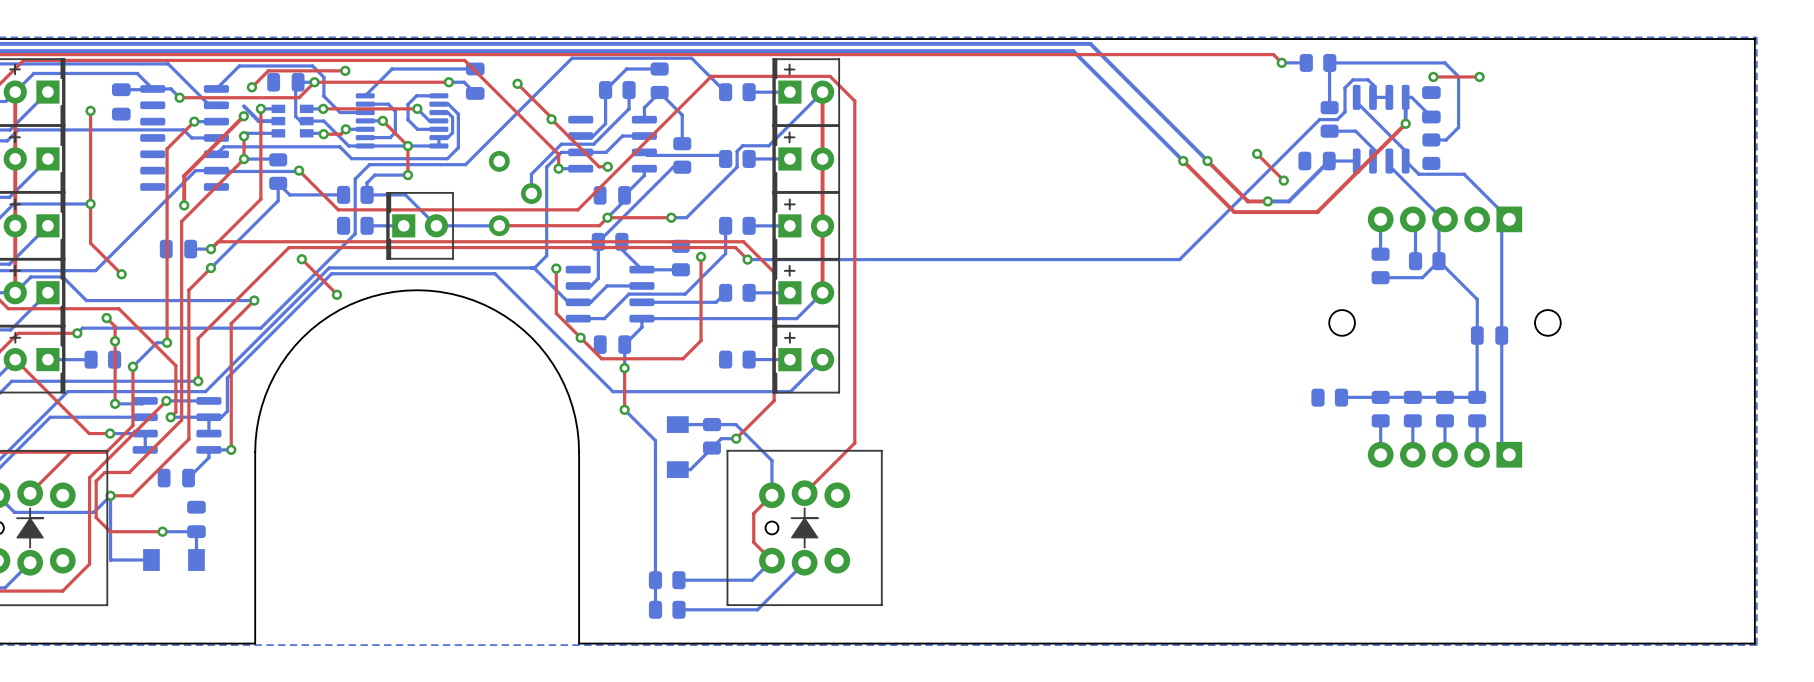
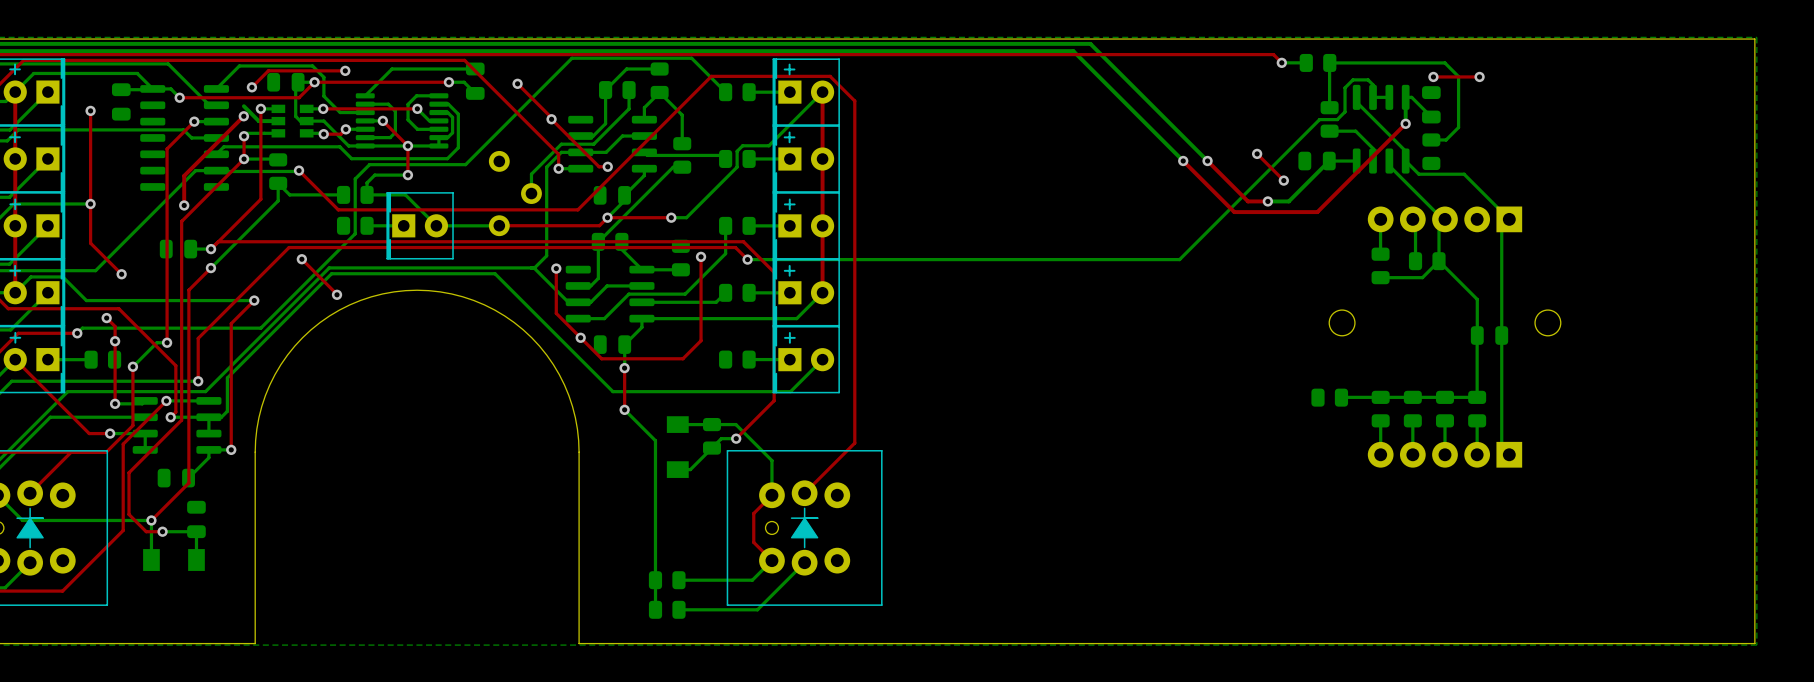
top track: (188, 439) (132, 495) (110, 495) -> (188, 439) (188, 483) (151, 520)
top track: (123, 444) (89, 477) (89, 564) -> (123, 444) (123, 530) (89, 564)
top track: (129, 472) (104, 472) (96, 481) (96, 517) (110, 531) (146, 531) -> (129, 472) (129, 514) (146, 531)
via position: (110, 495) -> (151, 520)
bottom track: (14, 512) (93, 512) (110, 495) (110, 560) -> (14, 512) (22, 520) (151, 520)
bottom track: (110, 560) (151, 560) -> (151, 520) (151, 560)

